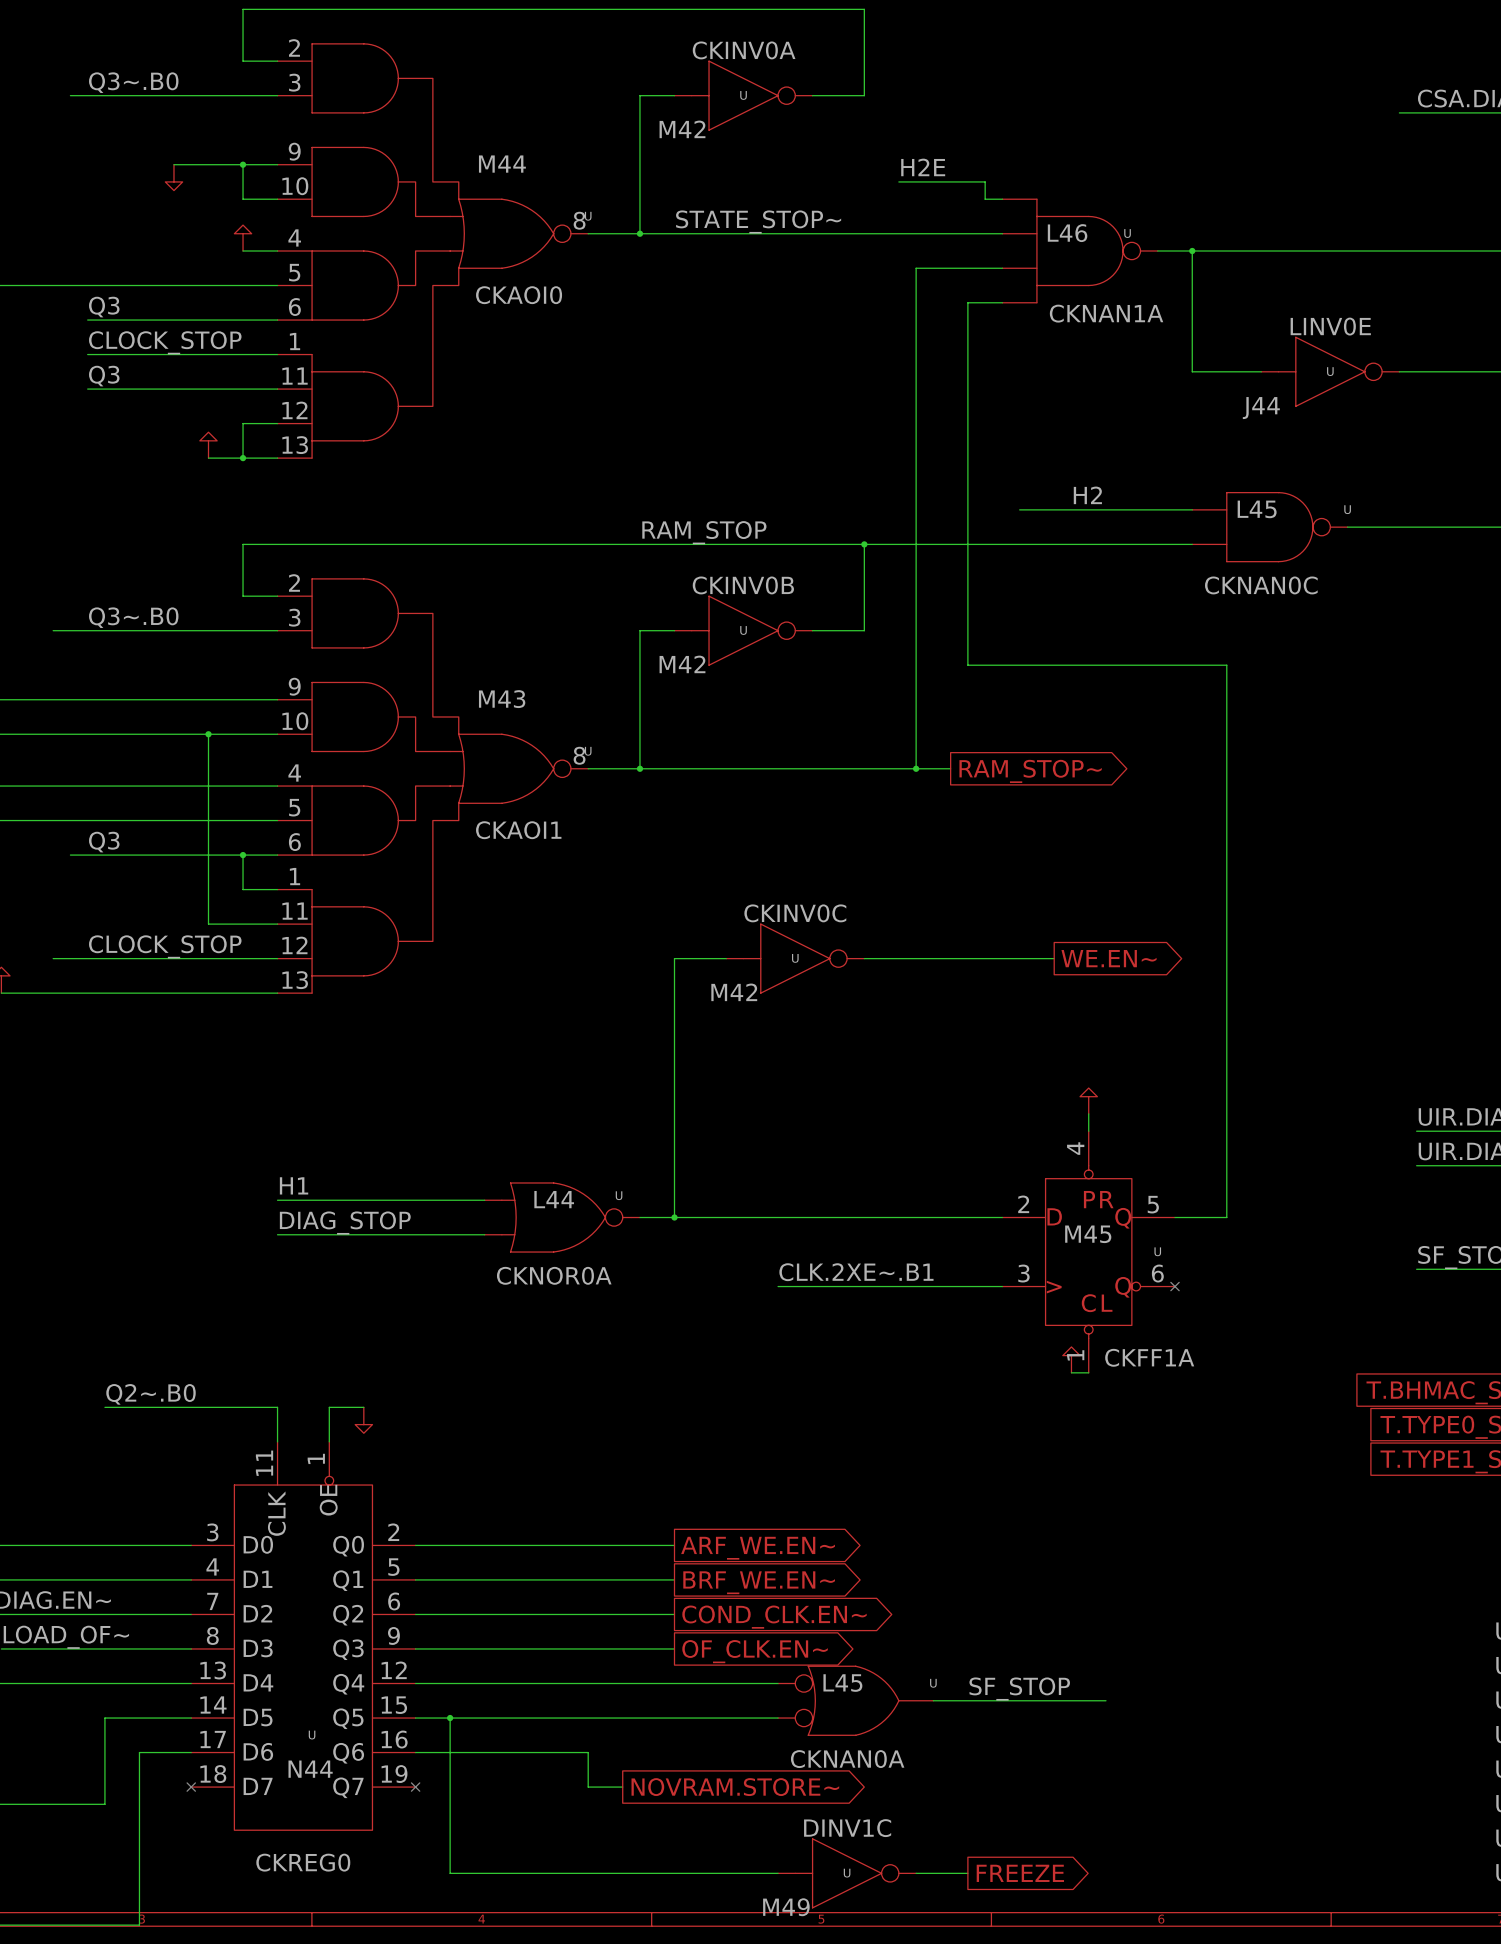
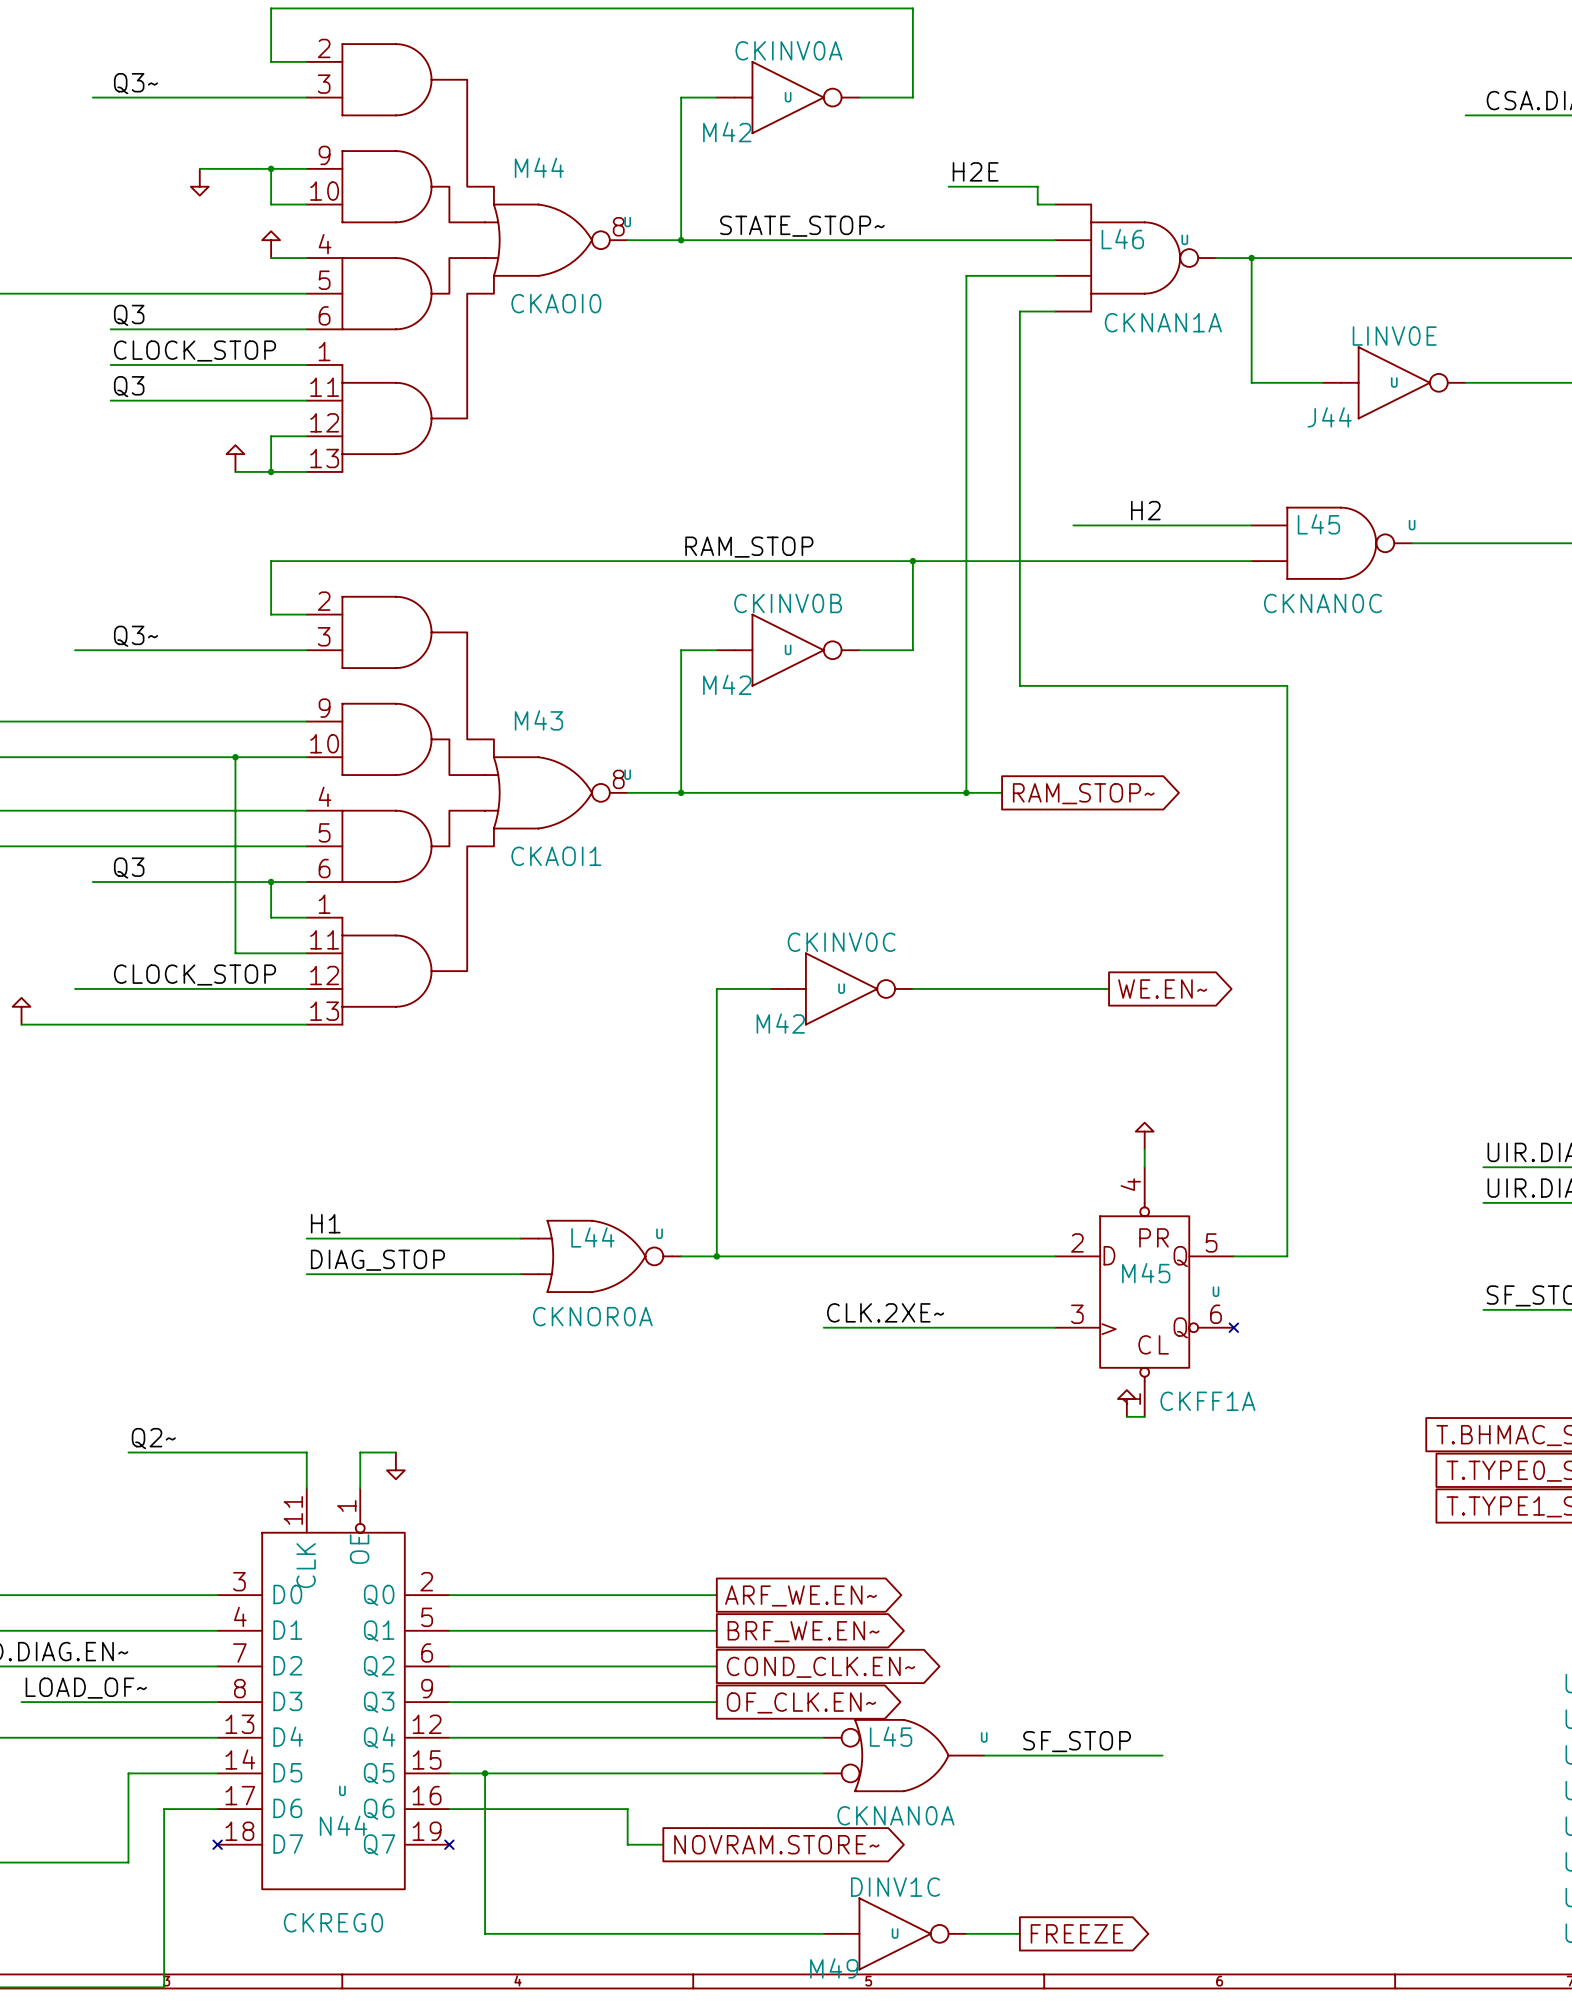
label: Q3~.B0 (133, 82) -> Q3~ (135, 83)
label: Q3~.B0 (133, 617) -> Q3~ (135, 636)
label: CLK.2XE~.B1 (856, 1272) -> CLK.2XE~ (885, 1312)
label: Q2~.B0 (151, 1394) -> Q2~ (153, 1438)

